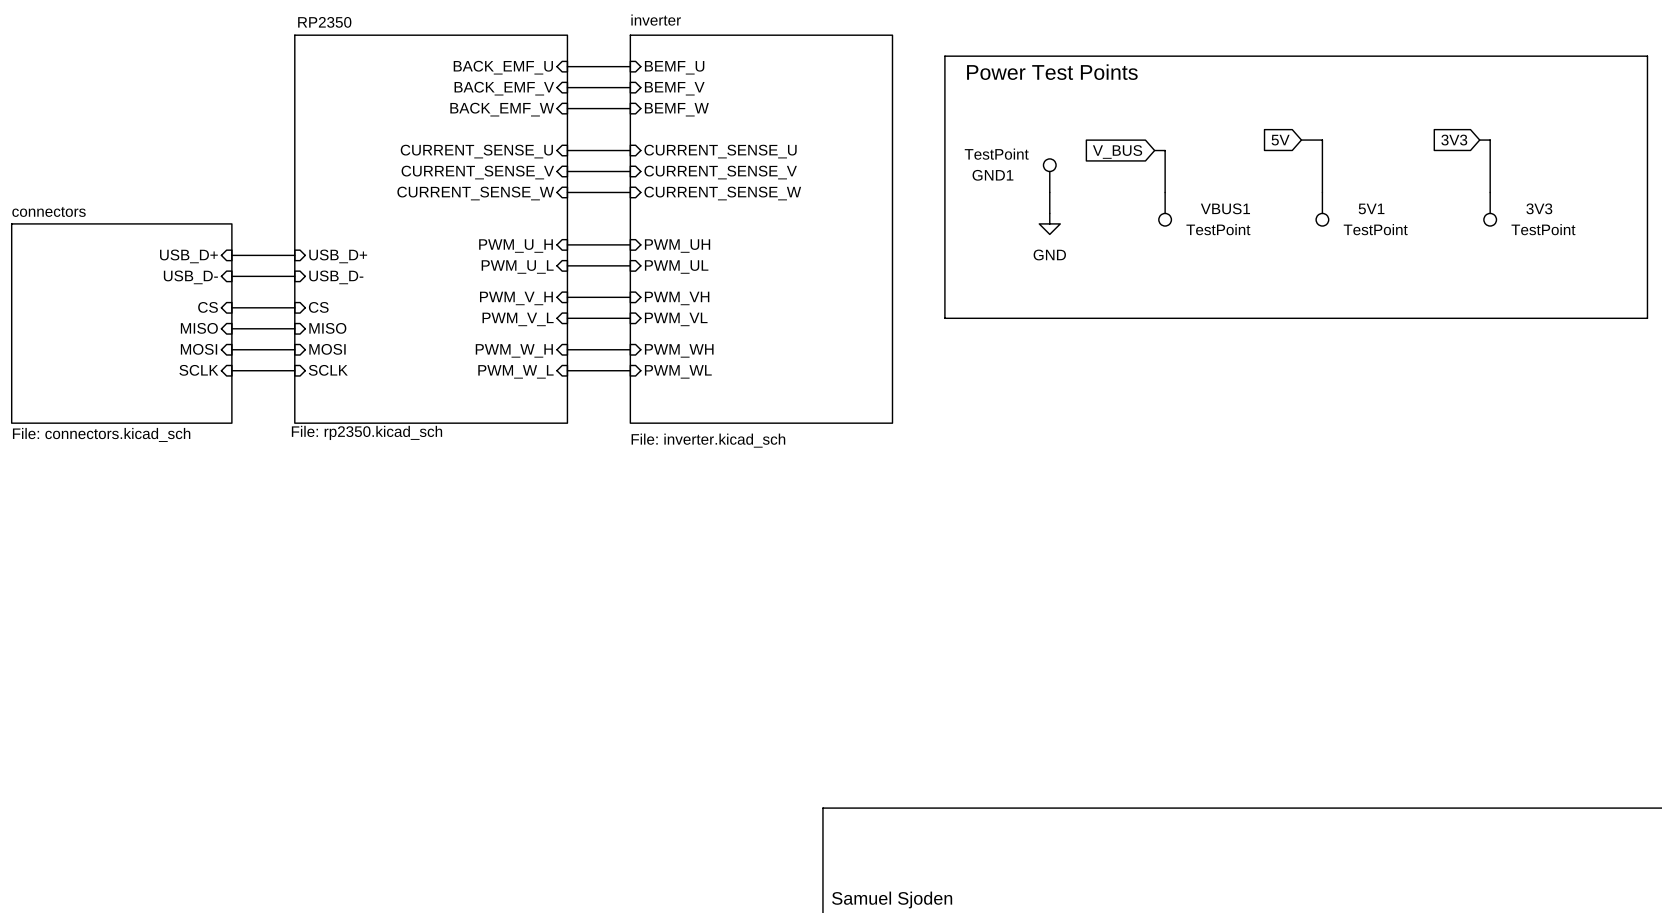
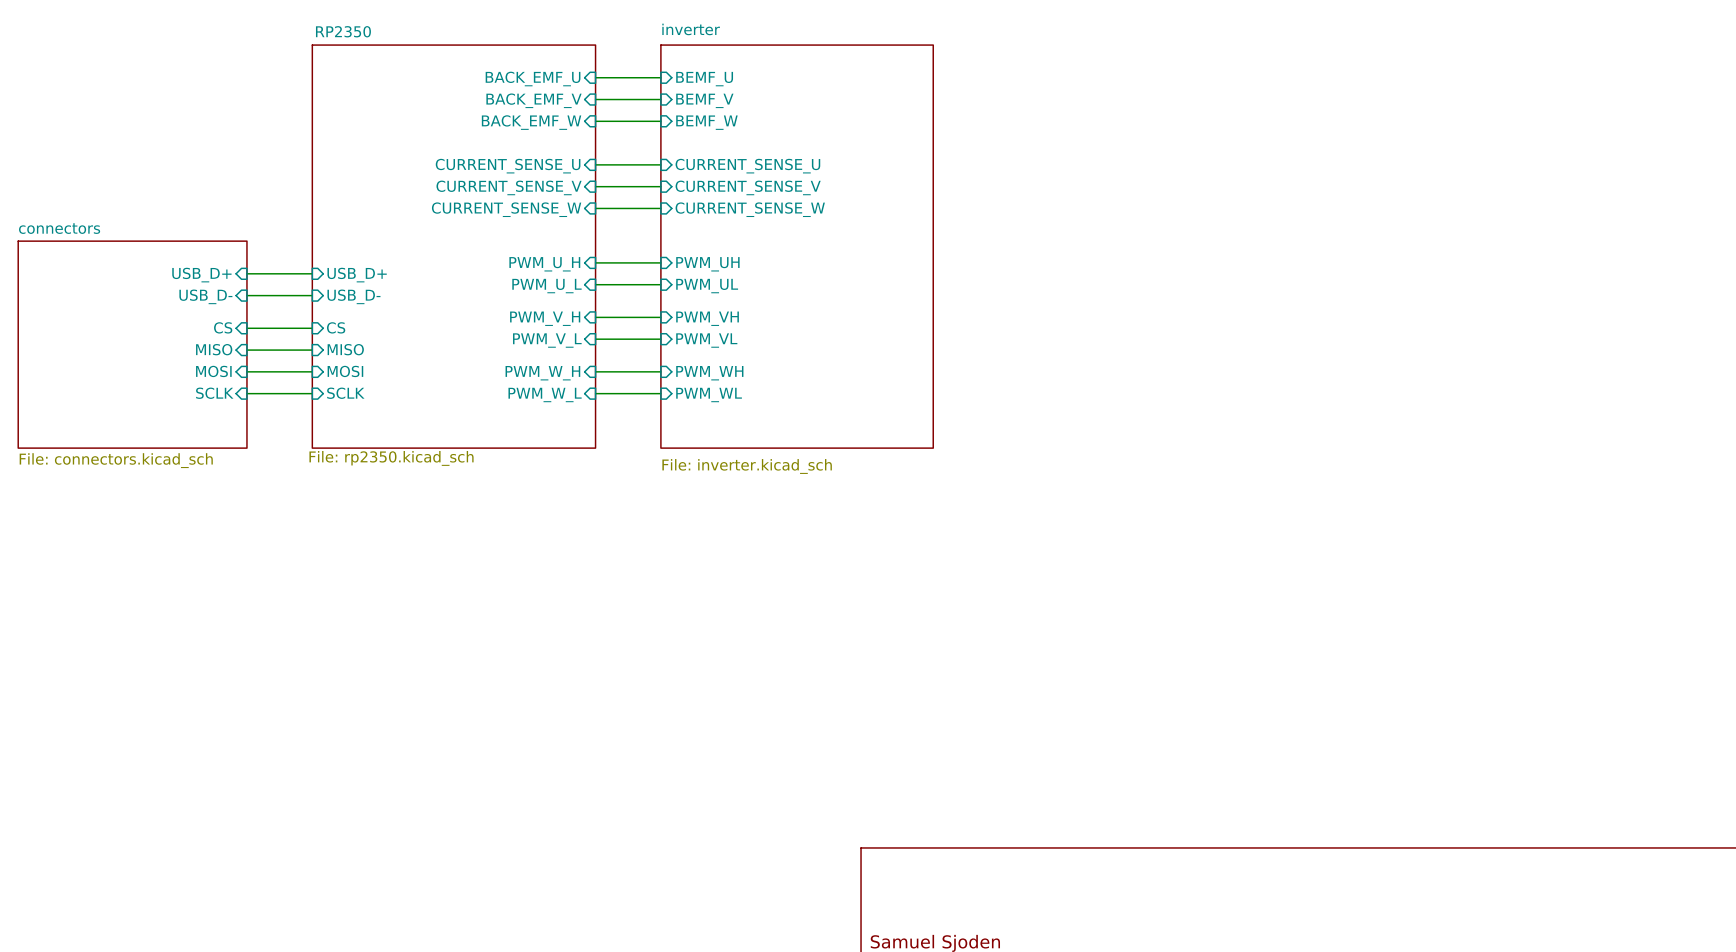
line: (944, 56) (1647, 56) (1647, 318) (944, 318) (944, 56) -> none
text: Power Test Points (1052, 72) -> none
global label: 5V (1280, 140) -> none
wire: (1301, 140) (1322, 140) (1322, 192) -> none
global label: 3V3 (1454, 140) -> none
wire: (1479, 140) (1490, 140) (1490, 192) -> none
wire: (1154, 150) (1165, 150) (1165, 192) -> none
global label: V_BUS (1117, 151) -> none
GND1: TestPoint (1049, 175) -> none
wire: (1049, 192) (1049, 213) -> none
VBUS1: TestPoint (1165, 209) -> none
5V1: TestPoint (1322, 209) -> none
3V3: TestPoint (1490, 209) -> none
power symbol: GND (1049, 223) -> none

